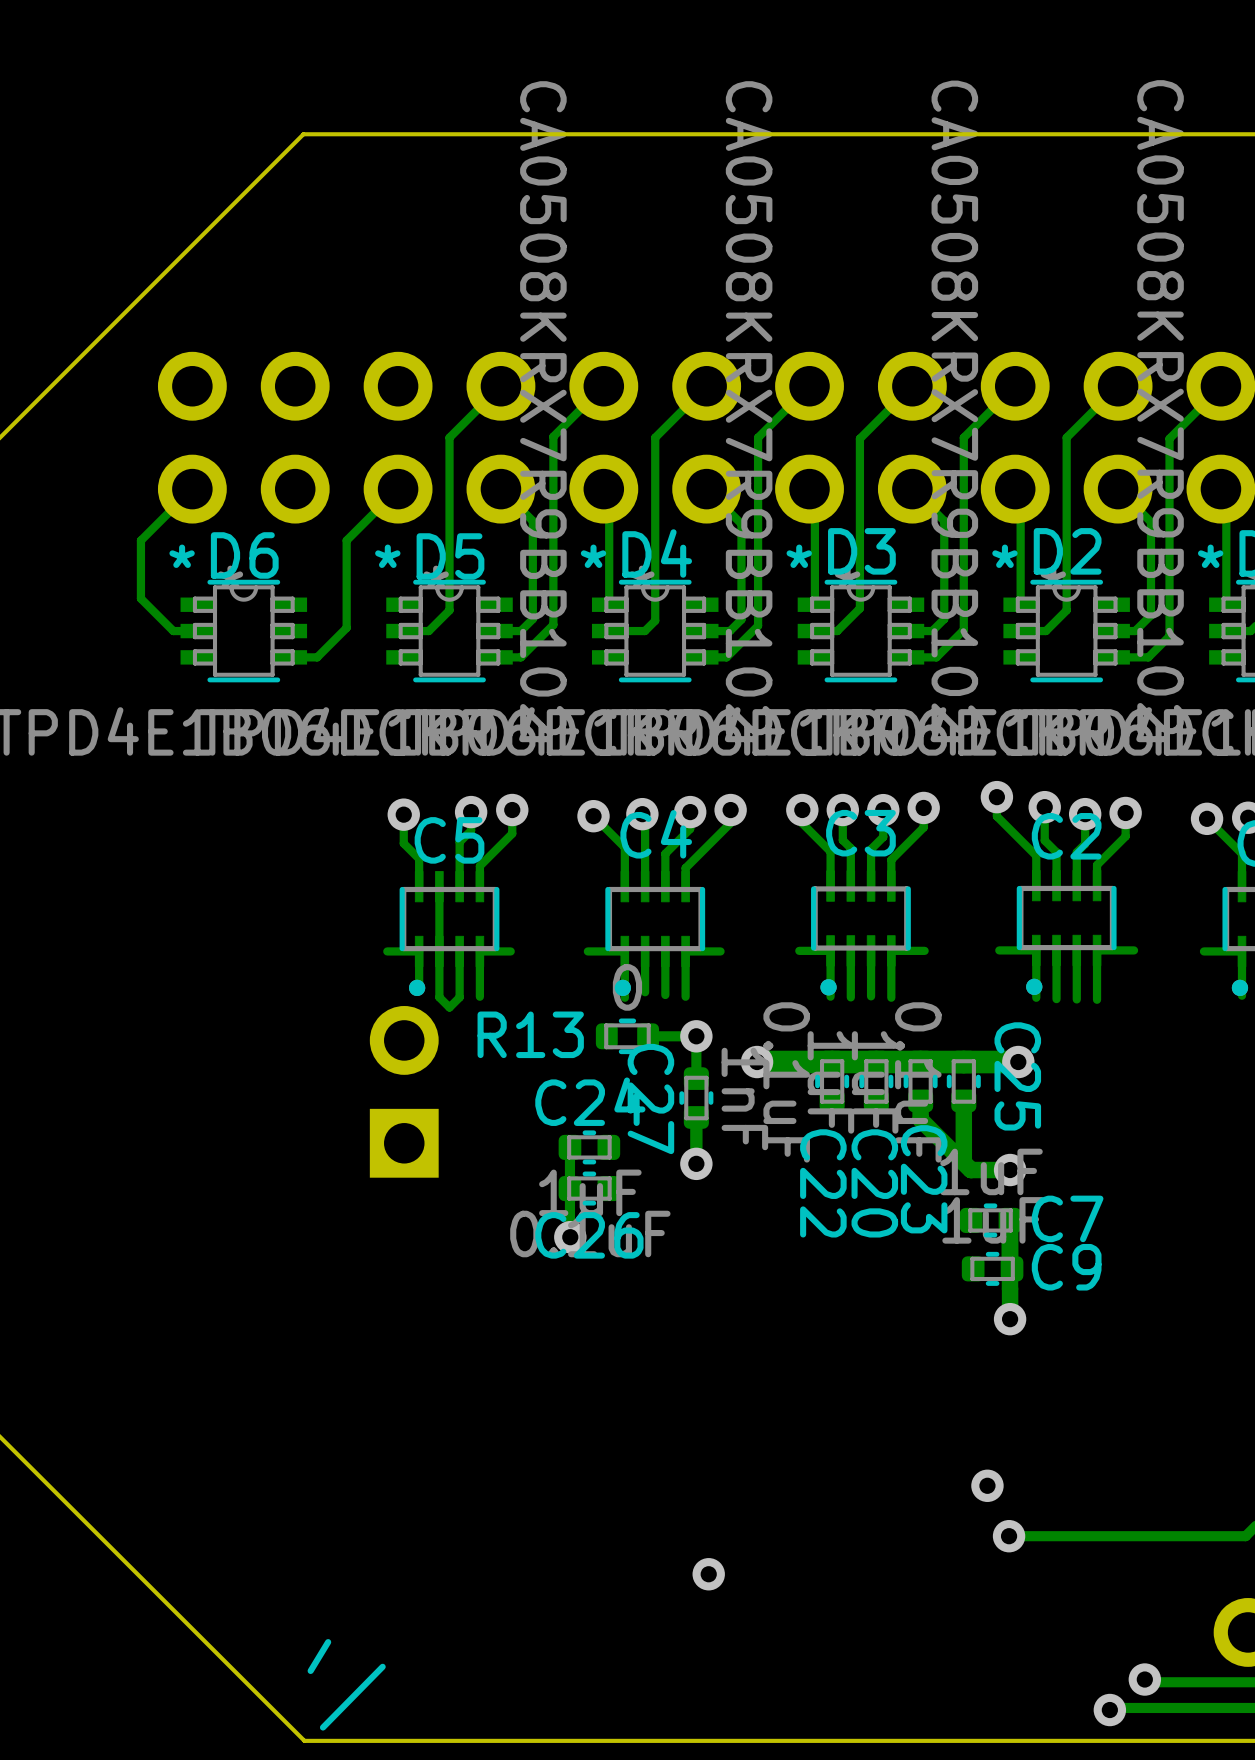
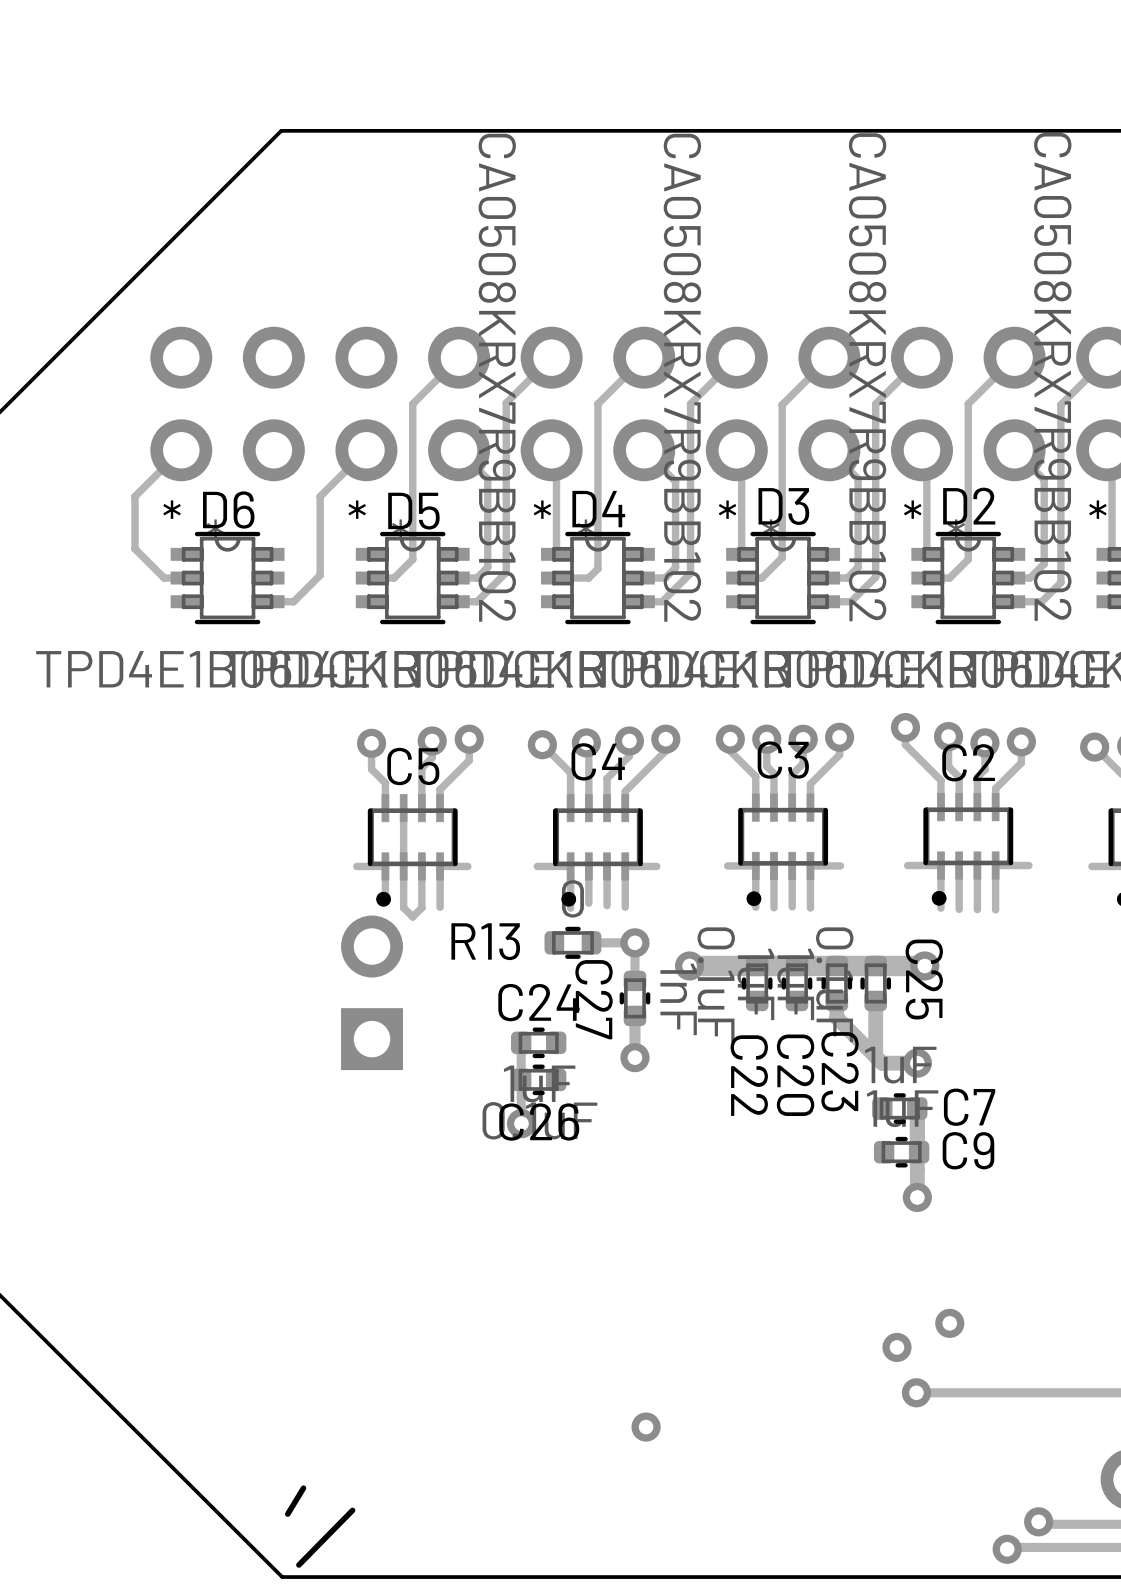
via: none -> (949, 1323)

